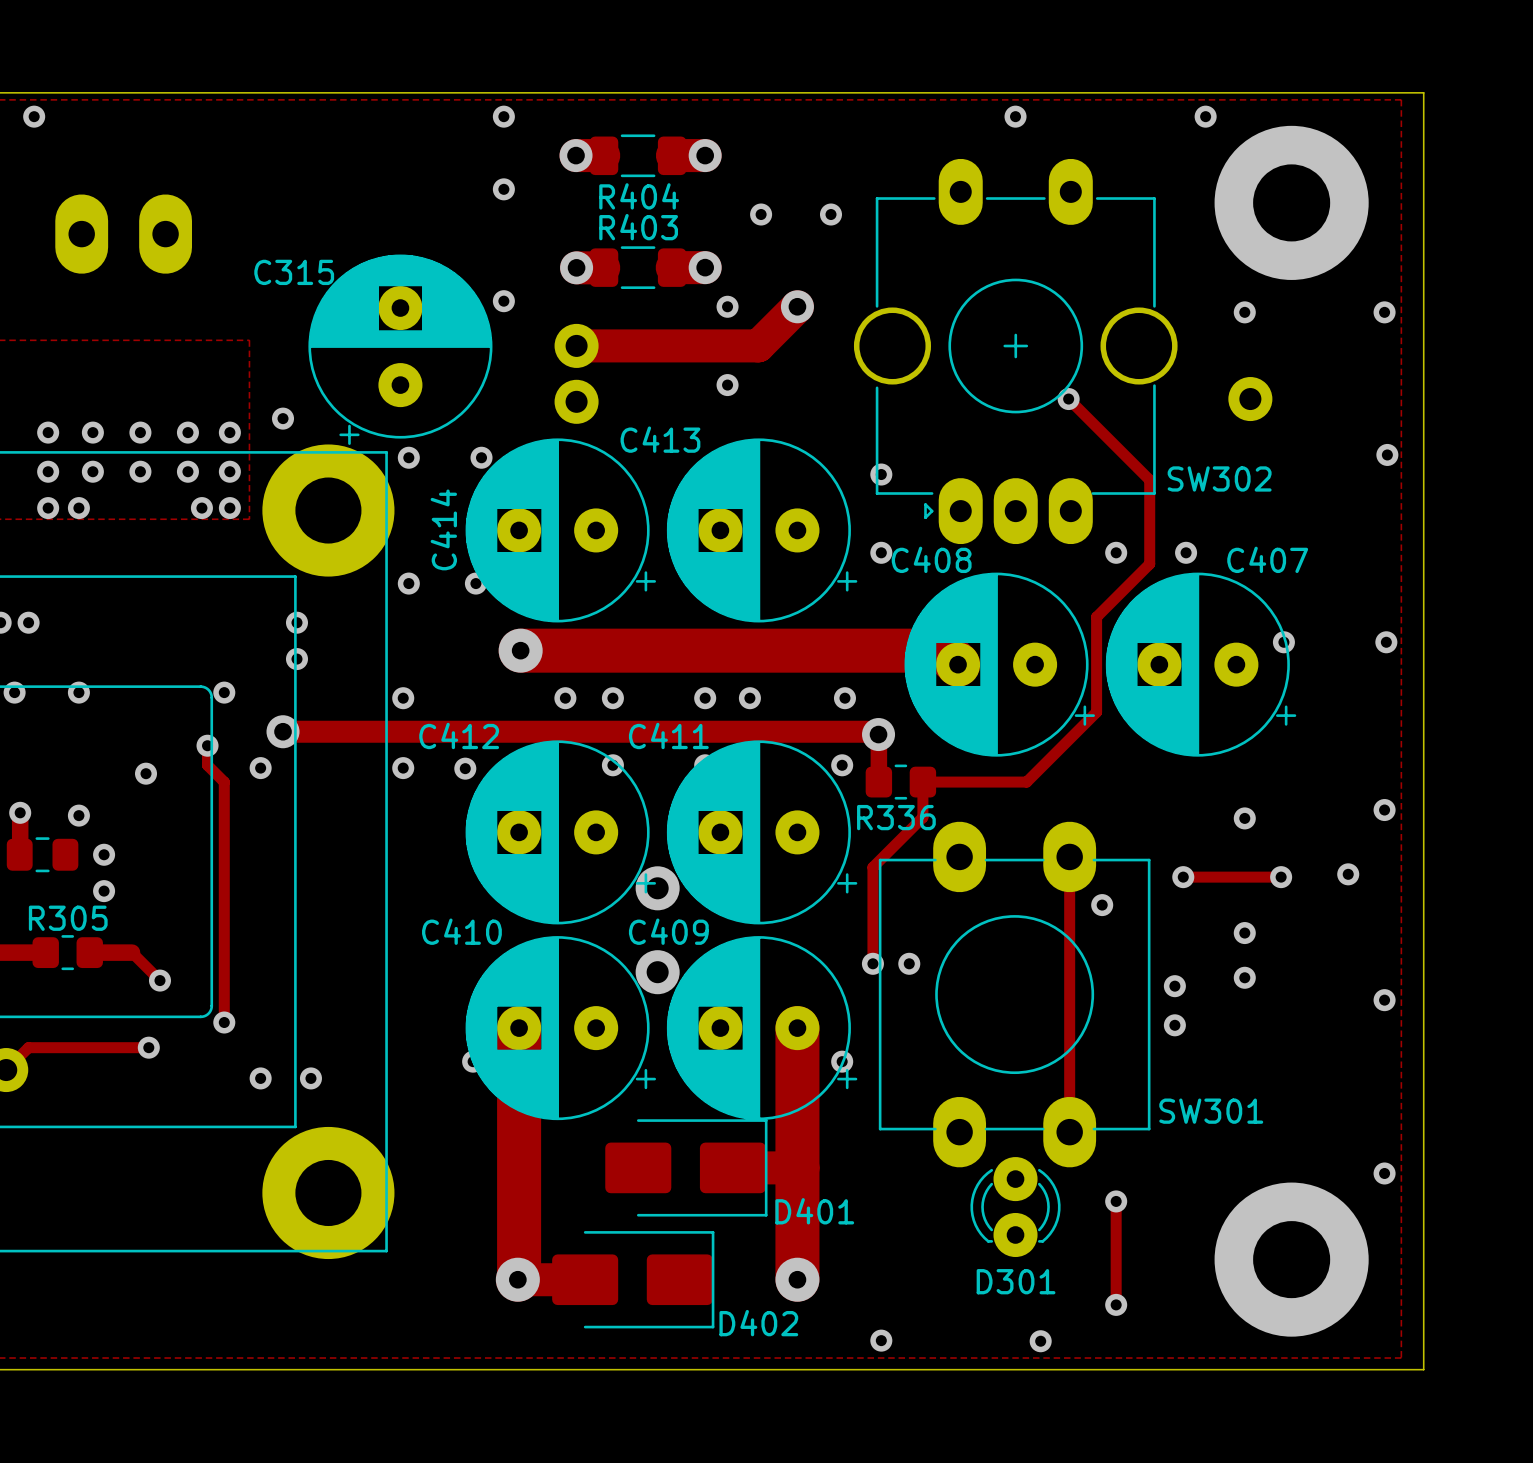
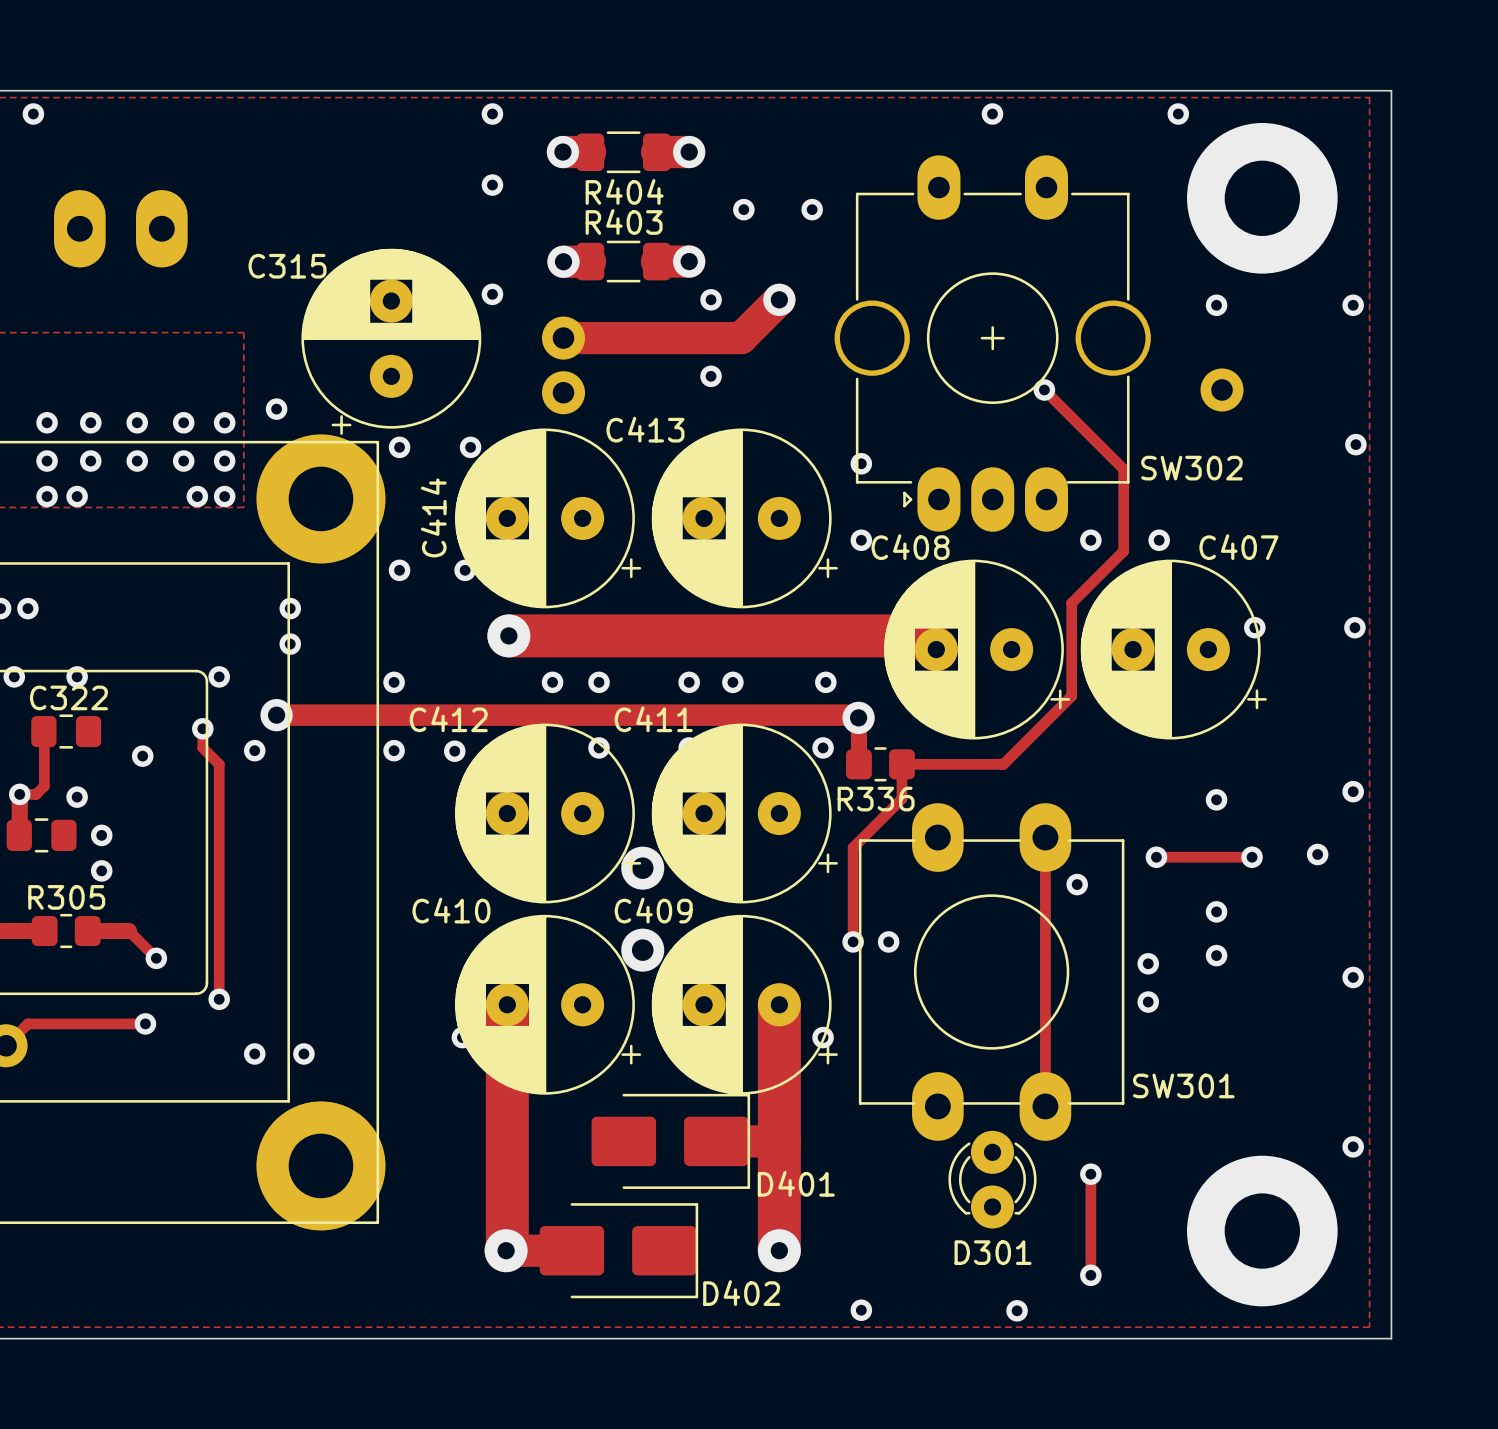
track: none -> (43, 731) (44, 786) (36, 794) (19, 794)
C322: none -> (66, 731)

